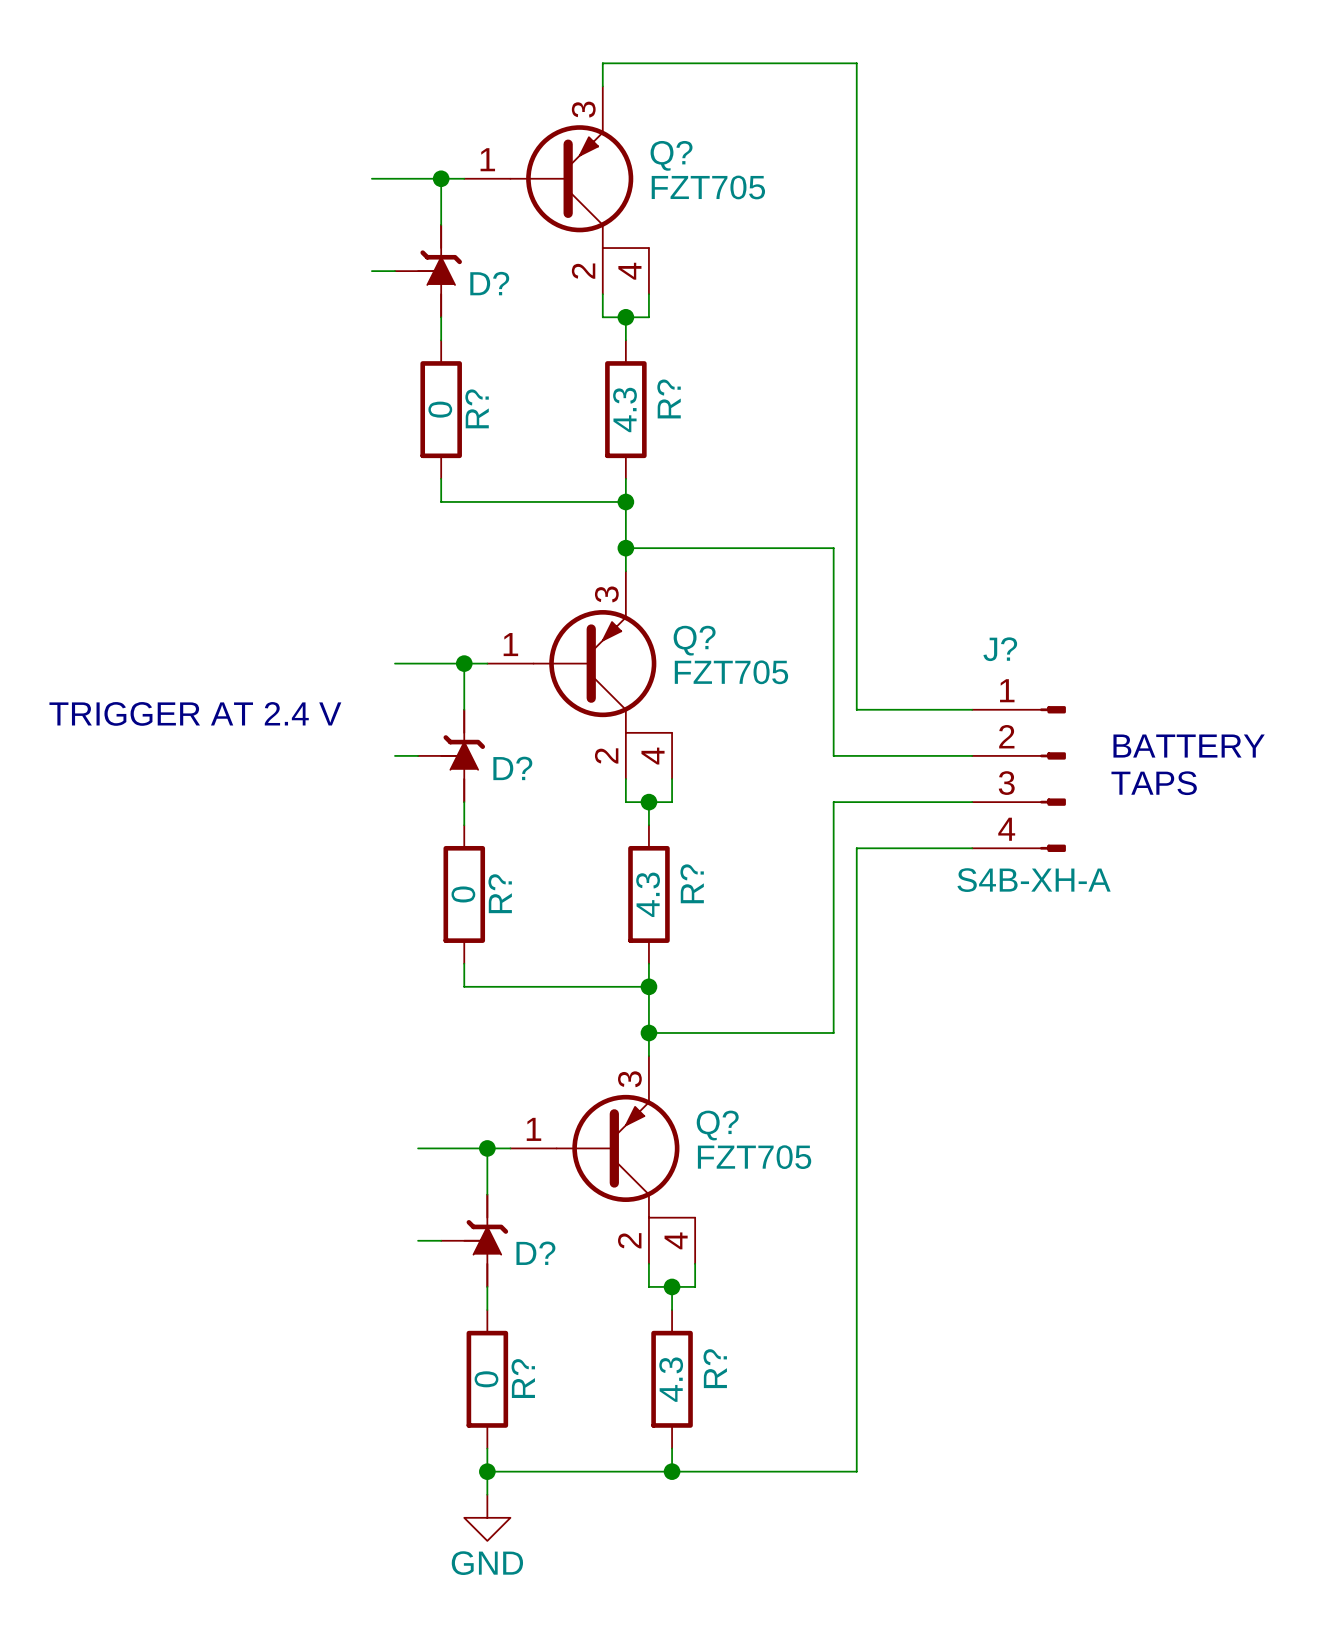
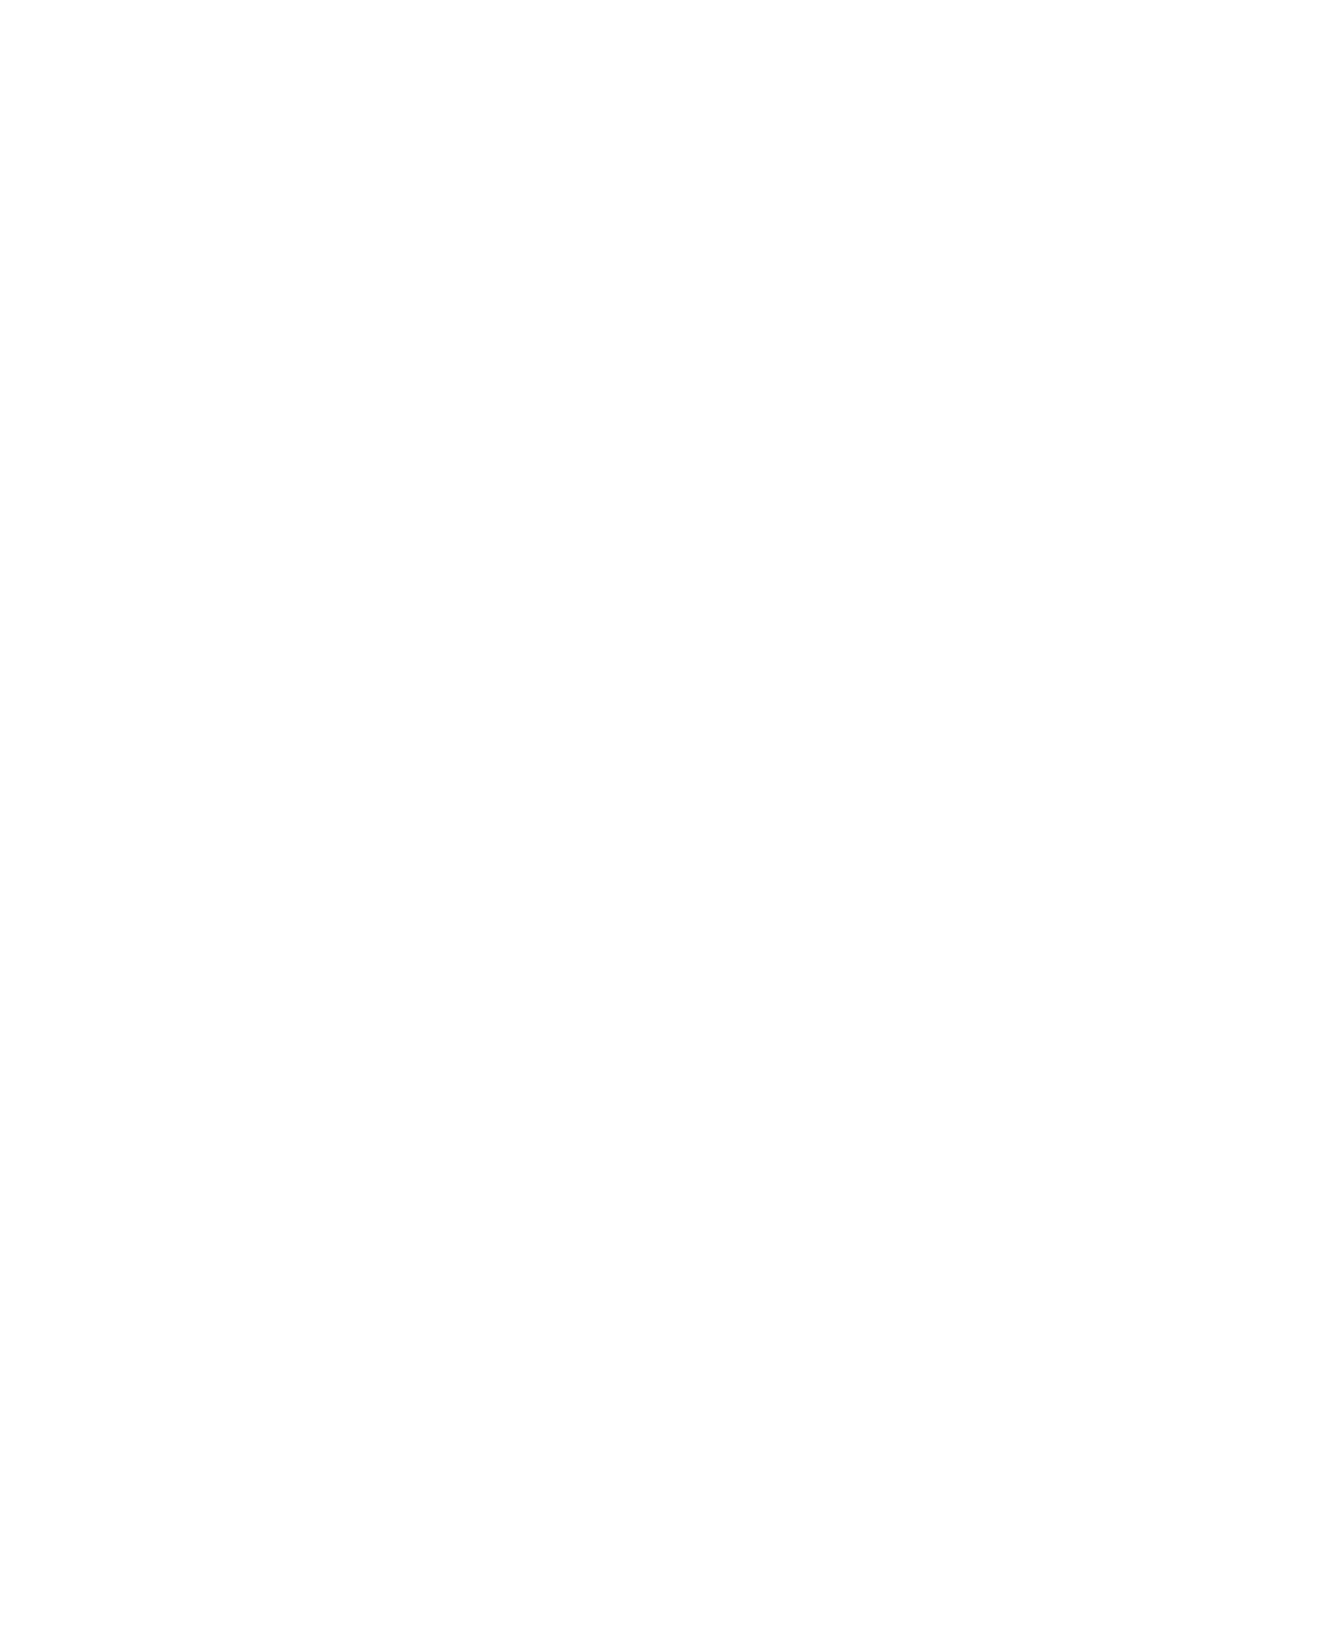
wire: (602, 86) (602, 63) (856, 63) (856, 709) (972, 709) -> none
wire: (371, 178) (464, 178) -> none
wire: (441, 178) (441, 224) -> none
junction: (441, 178) -> none
Q?: FZT705 (556, 190) -> none
wire: (371, 271) (395, 271) -> none
D?: (428, 271) -> none
wire: (602, 294) (602, 317) (648, 317) (648, 294) -> none
wire: (441, 317) (441, 340) -> none
wire: (625, 317) (625, 340) -> none
junction: (625, 317) -> none
R?: (441, 409) -> none
R?: (625, 409) -> none
wire: (441, 478) (441, 501) (625, 501) -> none
wire: (625, 478) (625, 571) -> none
junction: (625, 501) -> none
wire: (625, 548) (833, 548) (833, 755) (972, 755) -> none
junction: (625, 548) -> none
wire: (395, 663) (487, 663) -> none
wire: (464, 663) (464, 709) -> none
junction: (464, 663) -> none
Q?: FZT705 (579, 675) -> none
text: TRIGGER AT 2.4 V (195, 713) -> none
text: BATTERY (1189, 746) -> none
wire: (395, 755) (418, 755) -> none
D?: (451, 755) -> none
wire: (625, 779) (625, 802) (672, 802) (672, 779) -> none
J?: S4B-XH-A (1019, 779) -> none
text: TAPS (1154, 783) -> none
wire: (464, 802) (464, 825) -> none
wire: (648, 802) (648, 825) -> none
junction: (648, 802) -> none
wire: (972, 802) (833, 802) (833, 1032) (648, 1032) -> none
wire: (972, 848) (856, 848) (856, 1471) (487, 1471) -> none
R?: (464, 894) -> none
R?: (648, 894) -> none
wire: (464, 963) (464, 986) (648, 986) -> none
wire: (648, 963) (648, 1056) -> none
junction: (648, 986) -> none
junction: (648, 1032) -> none
wire: (418, 1148) (510, 1148) -> none
wire: (487, 1148) (487, 1194) -> none
junction: (487, 1148) -> none
Q?: FZT705 (602, 1159) -> none
wire: (418, 1240) (441, 1240) -> none
D?: (474, 1240) -> none
wire: (648, 1263) (648, 1286) (695, 1286) (695, 1263) -> none
wire: (487, 1286) (487, 1310) -> none
wire: (672, 1286) (672, 1310) -> none
junction: (672, 1286) -> none
R?: (487, 1379) -> none
R?: (672, 1379) -> none
wire: (487, 1448) (487, 1494) -> none
wire: (672, 1448) (672, 1471) -> none
junction: (487, 1471) -> none
junction: (672, 1471) -> none
power symbol: GND (487, 1517) -> none

